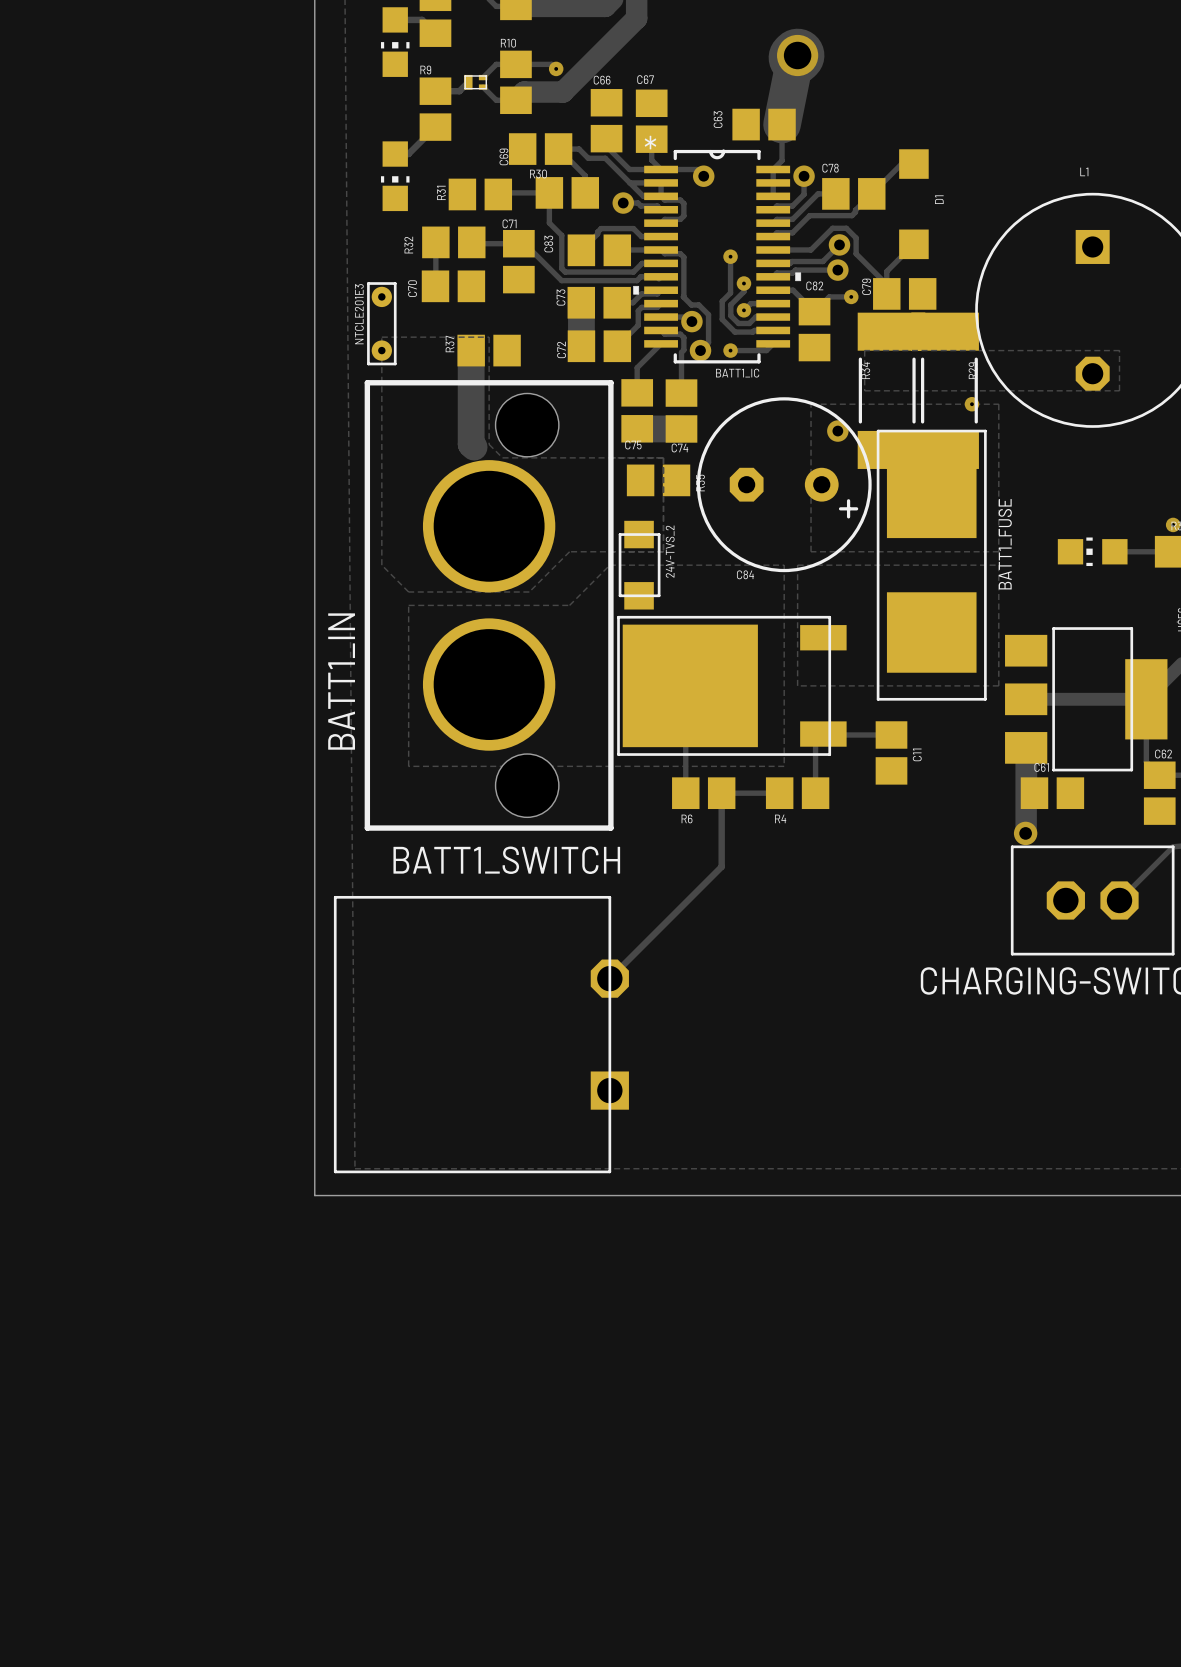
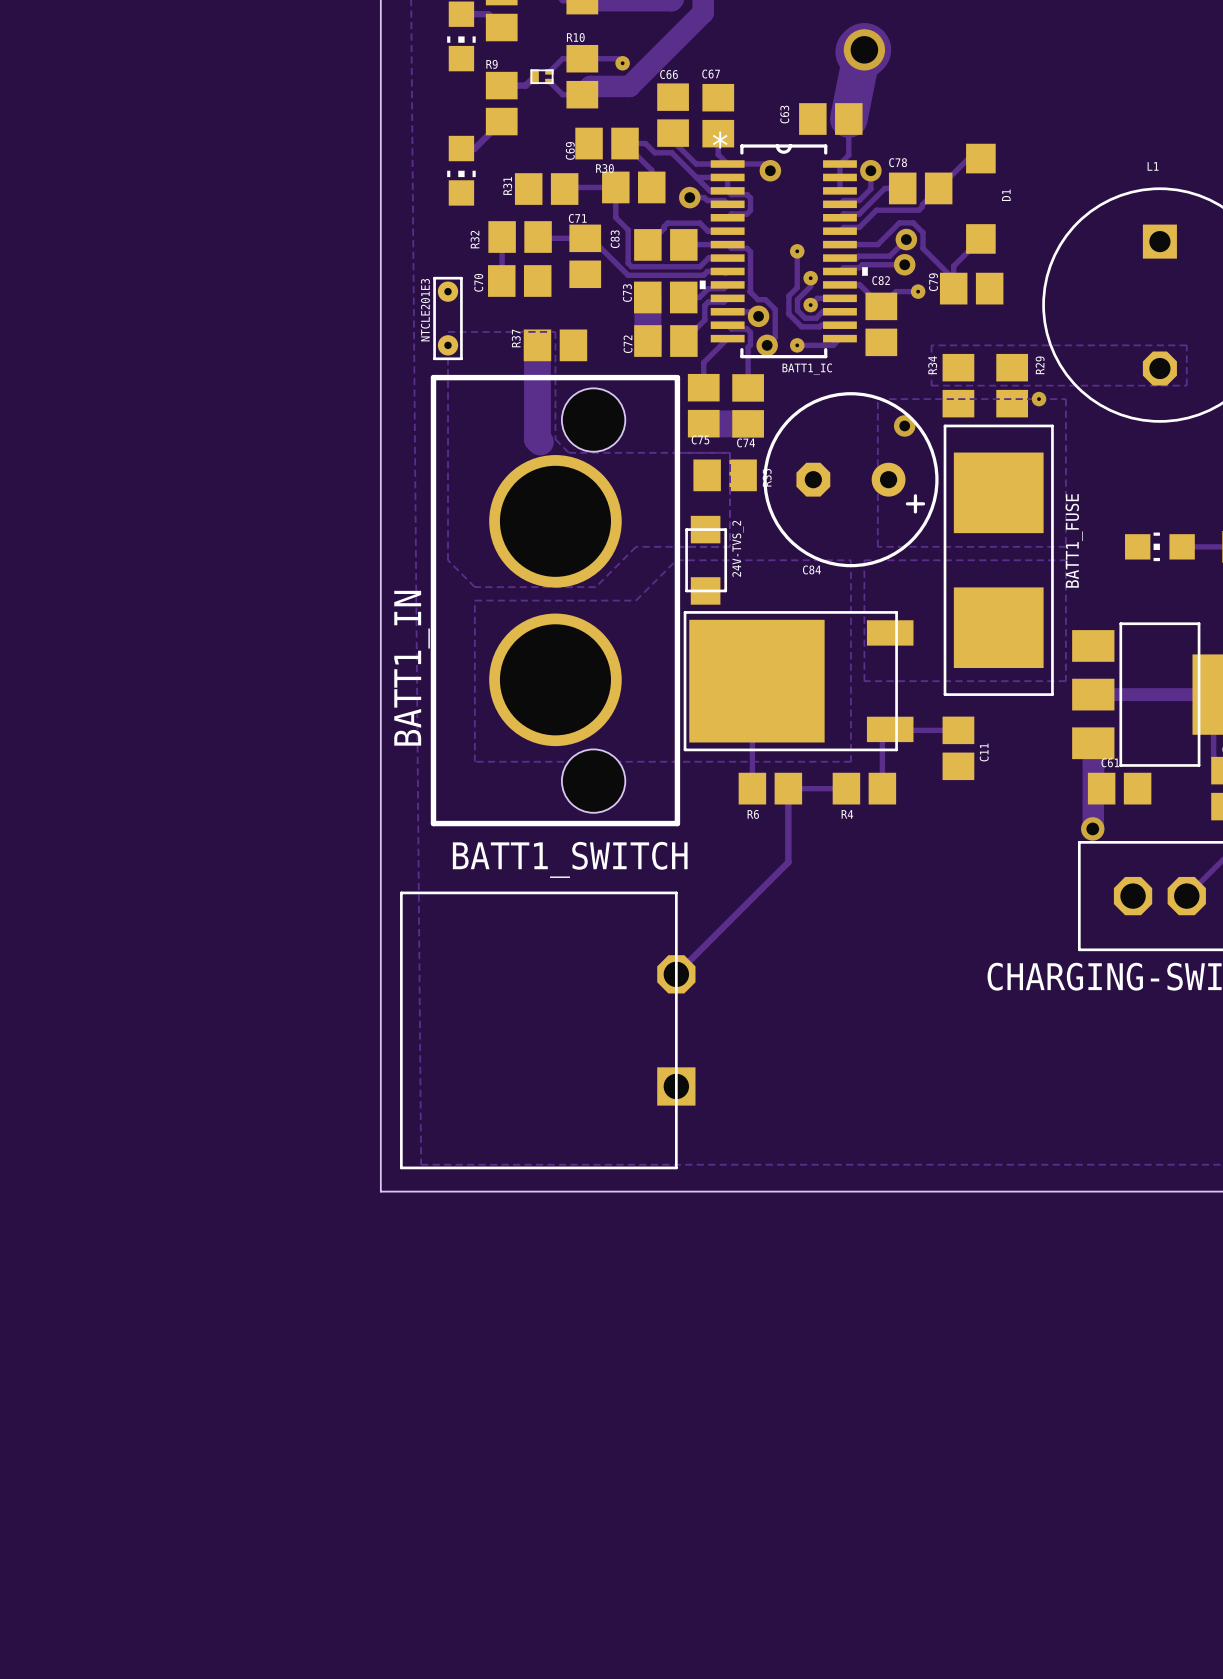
R34 footprint: [857, 312, 926, 469] -> [942, 353, 975, 418]
R29 footprint: [911, 312, 979, 469] -> [996, 353, 1029, 418]

